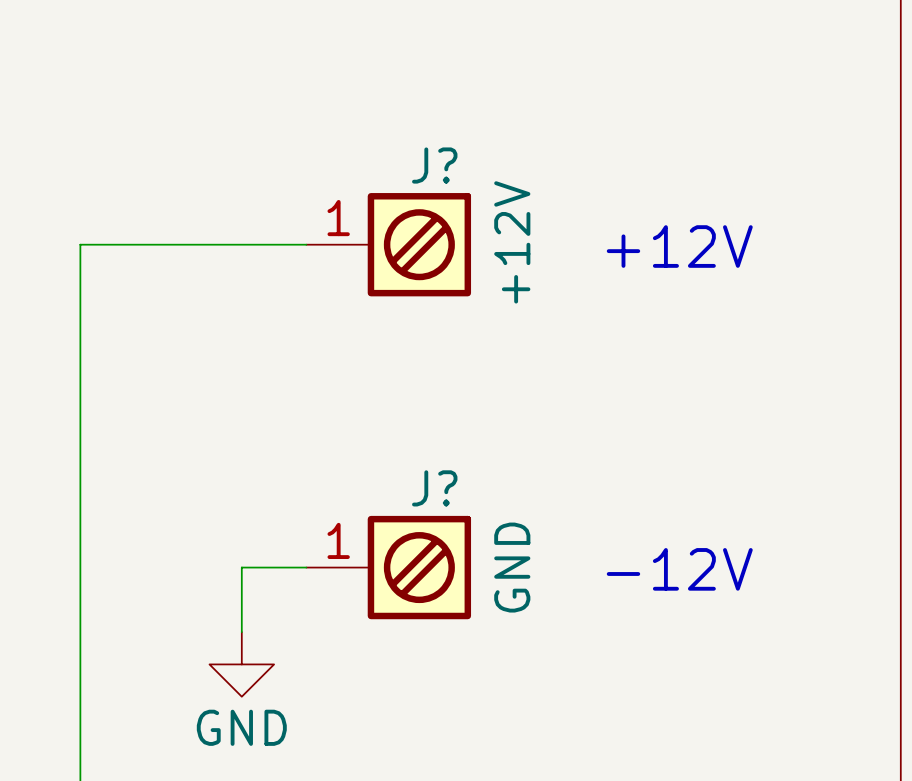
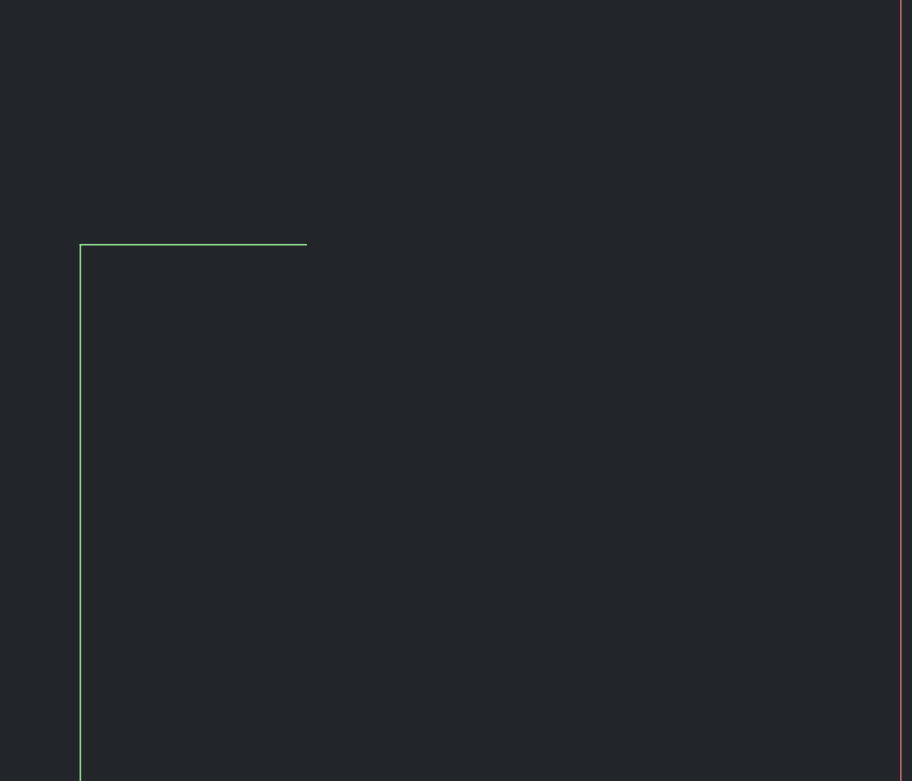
J?: +12V (388, 244) -> none
text: +12V (679, 246) -> none
wire: (306, 567) (241, 567) (241, 632) -> none
J?: GND (388, 567) -> none
text: -12V (679, 569) -> none
power symbol: GND (241, 664) -> none

